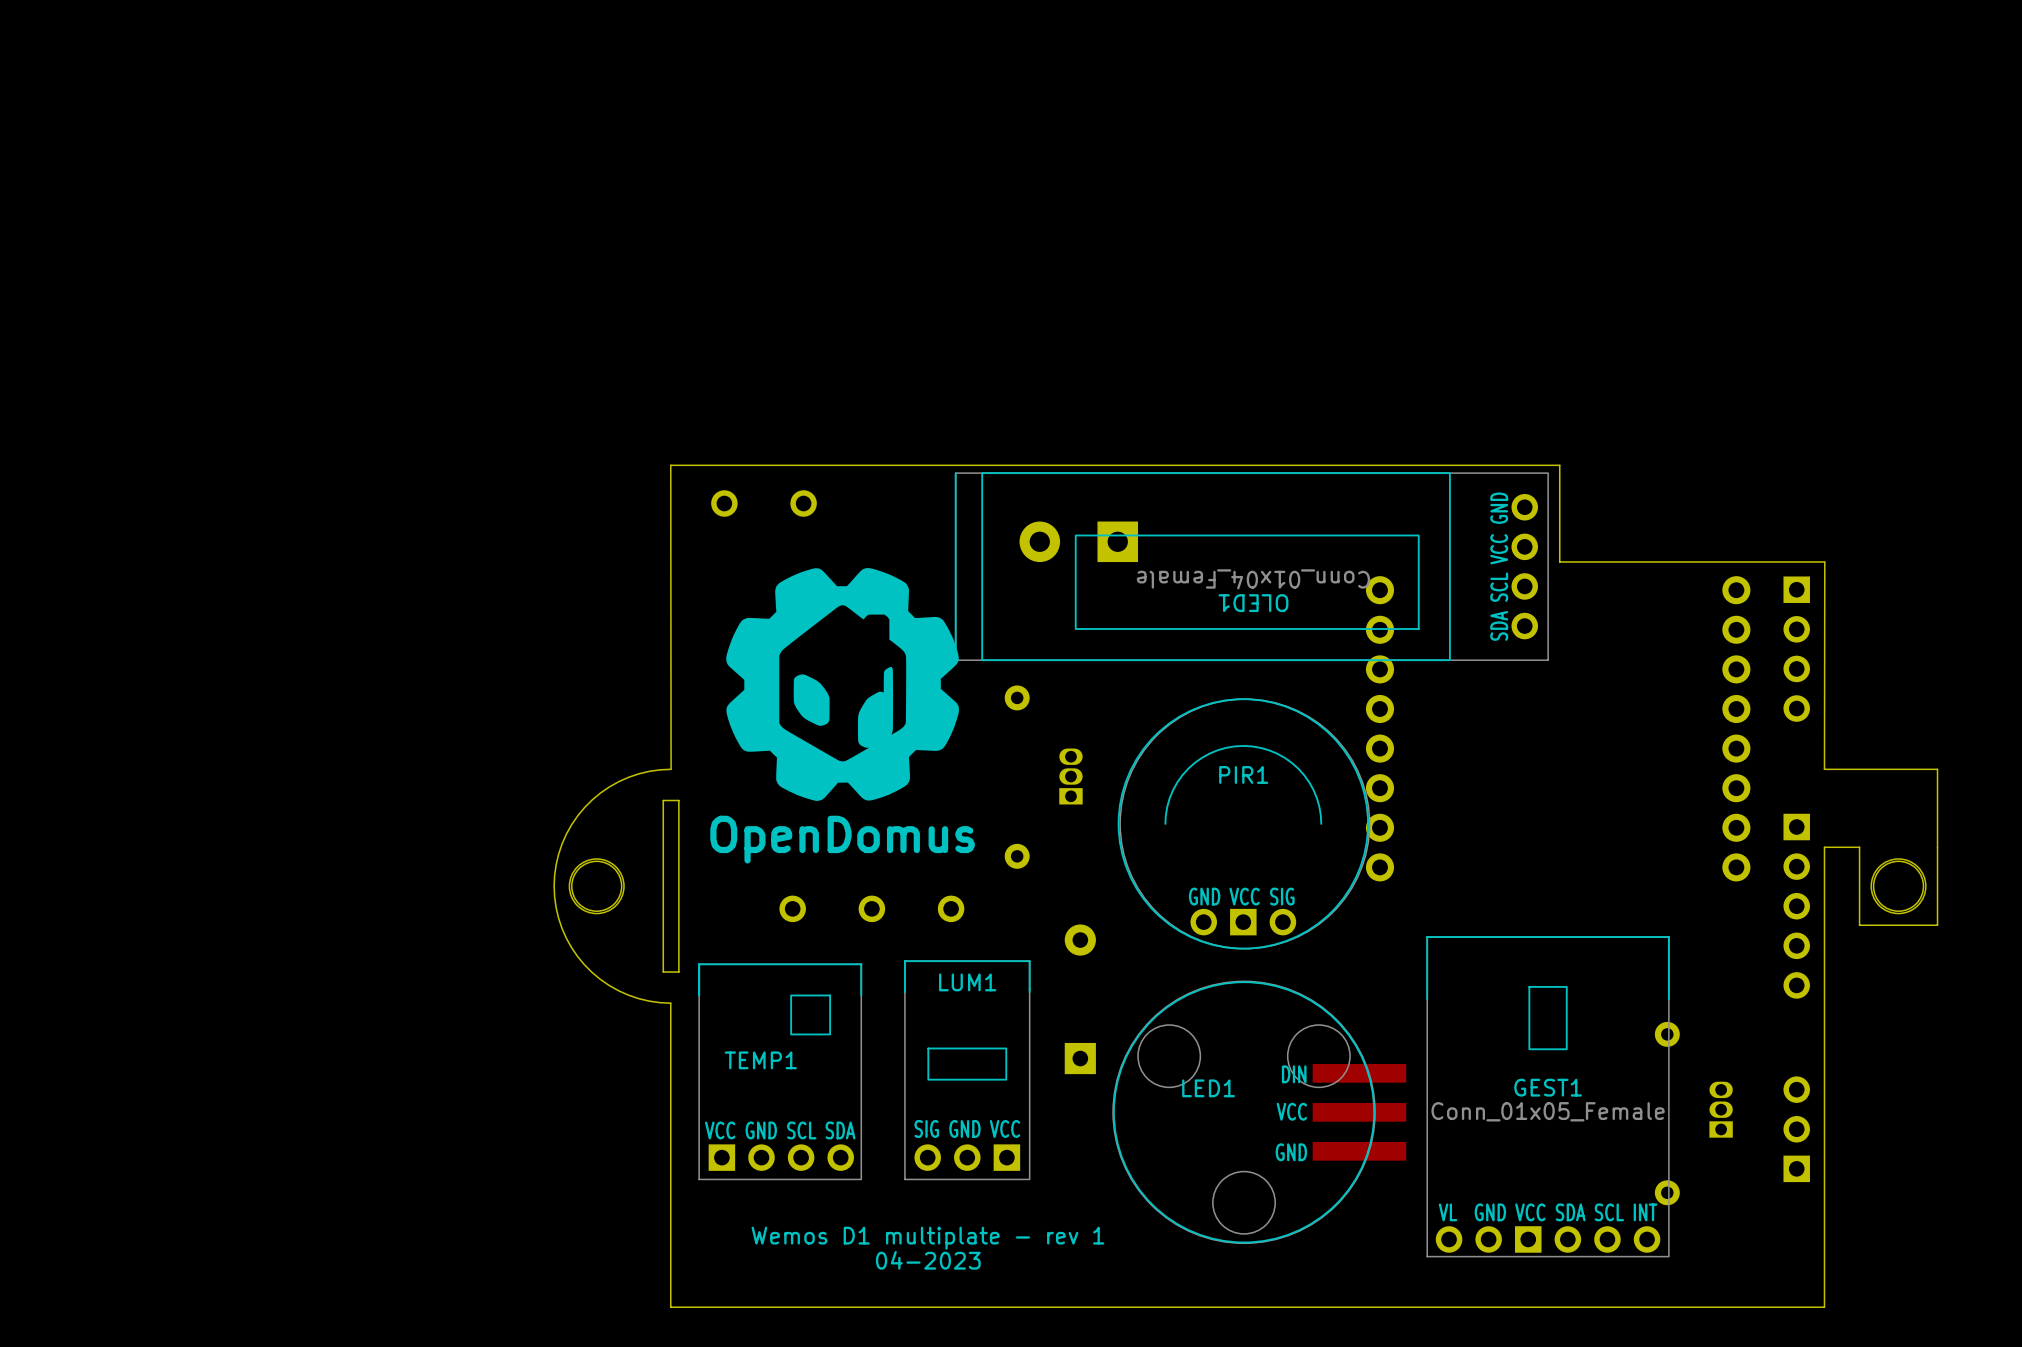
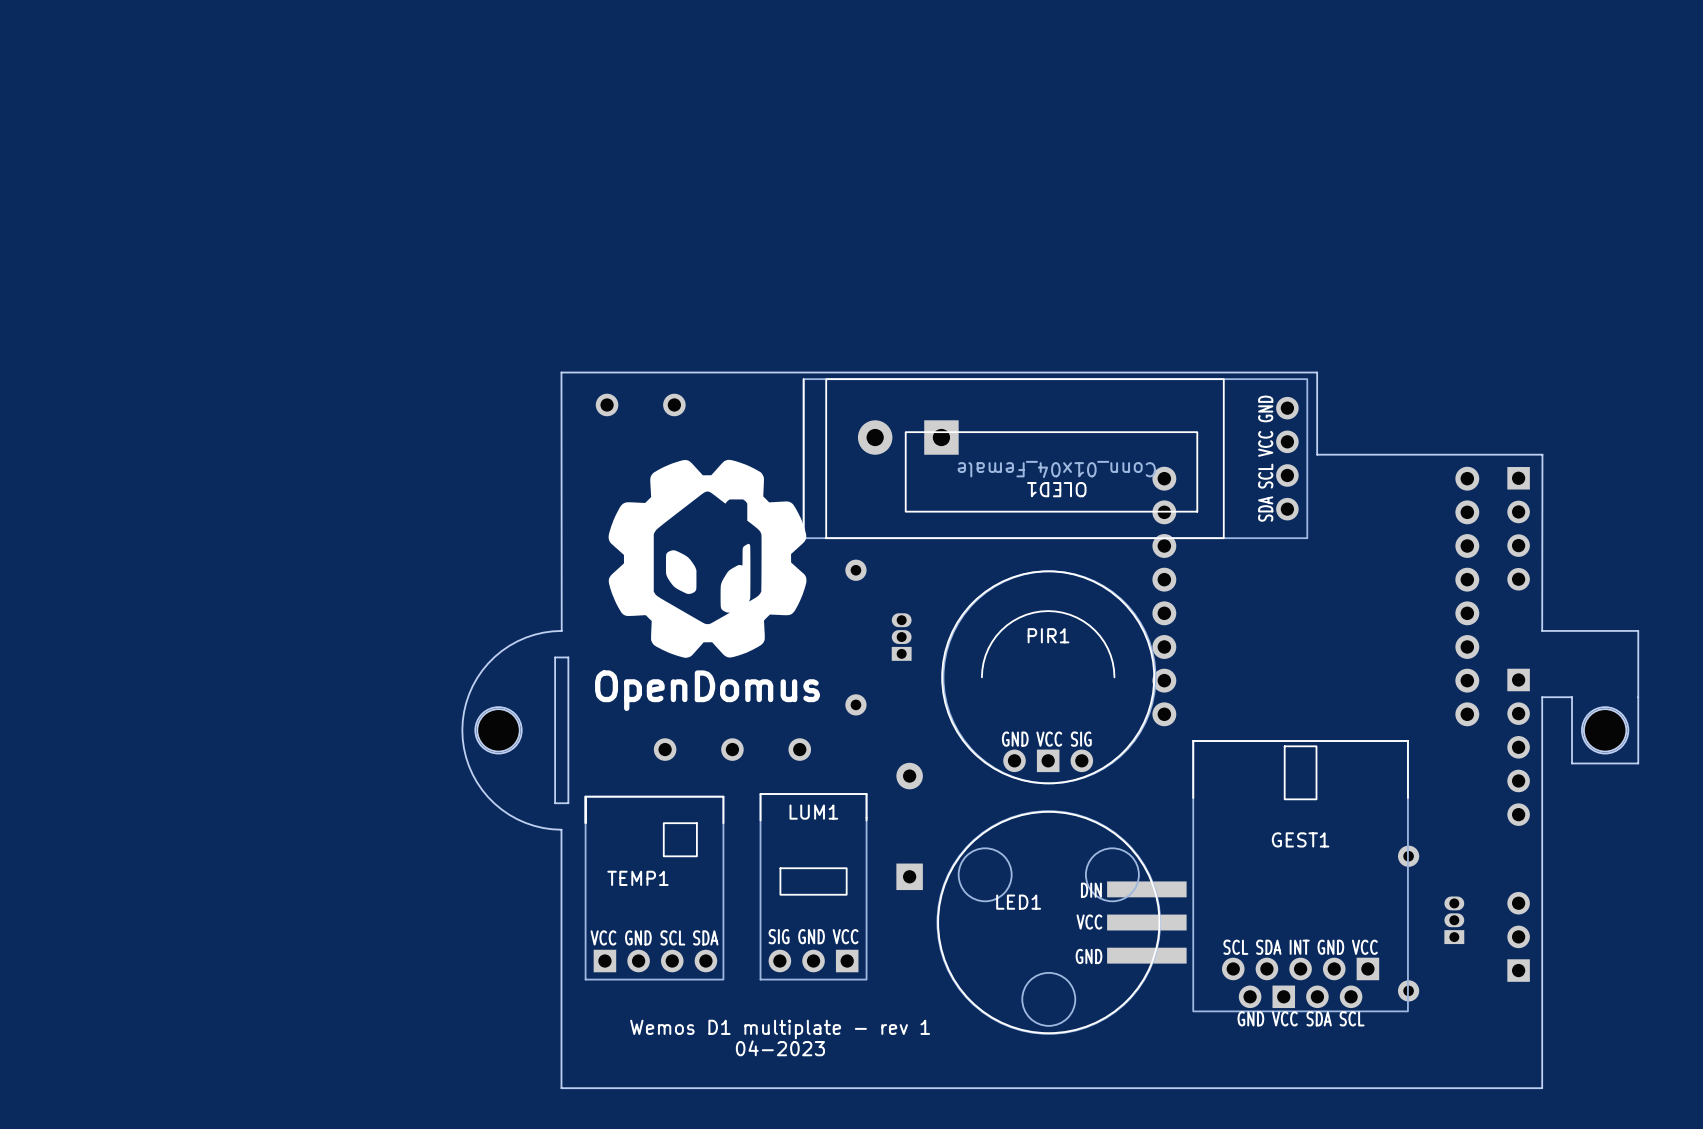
GEST1 footprint: [1426, 936, 1670, 1258] -> [1192, 740, 1409, 1013]
GEST1 name position: GEST1 (1548, 1087) -> GEST1 (1300, 839)
GEST1 value: Conn_01x05_Female (1548, 1111) -> none

